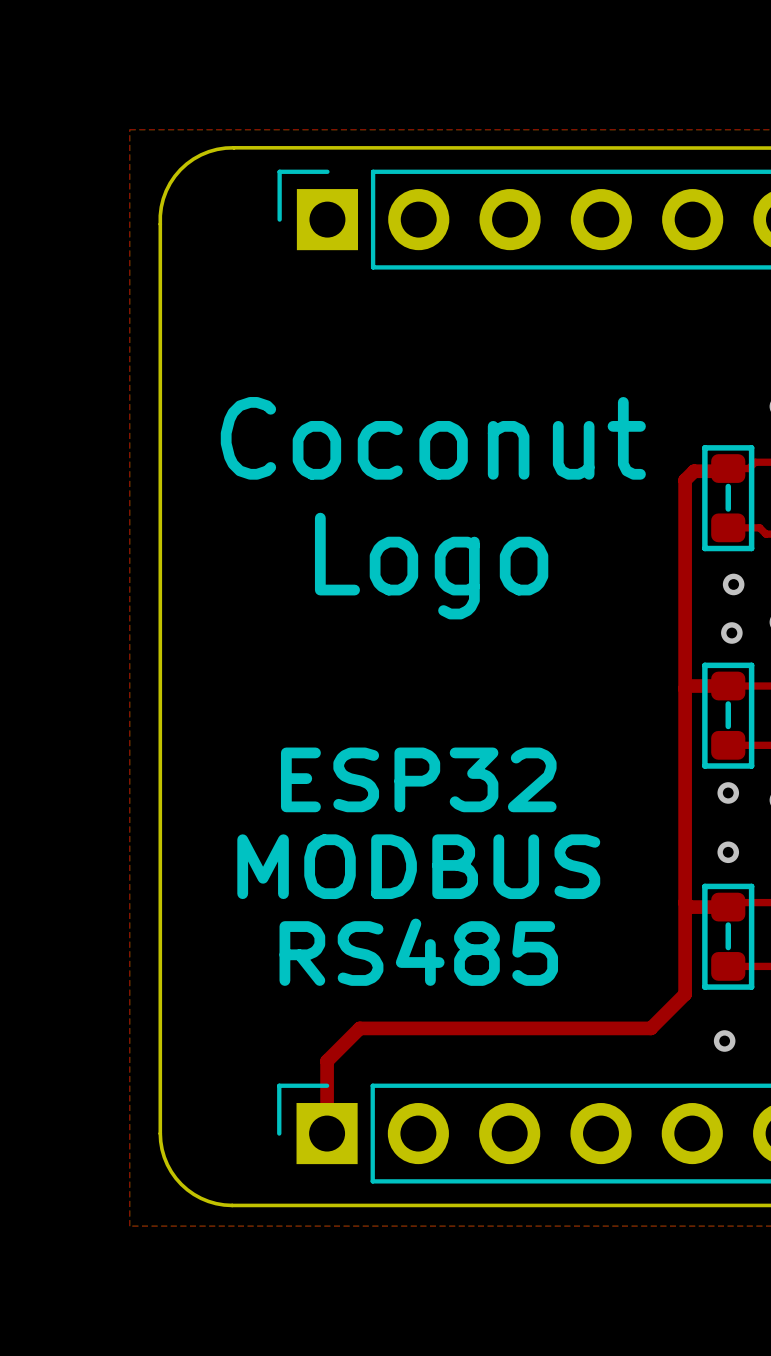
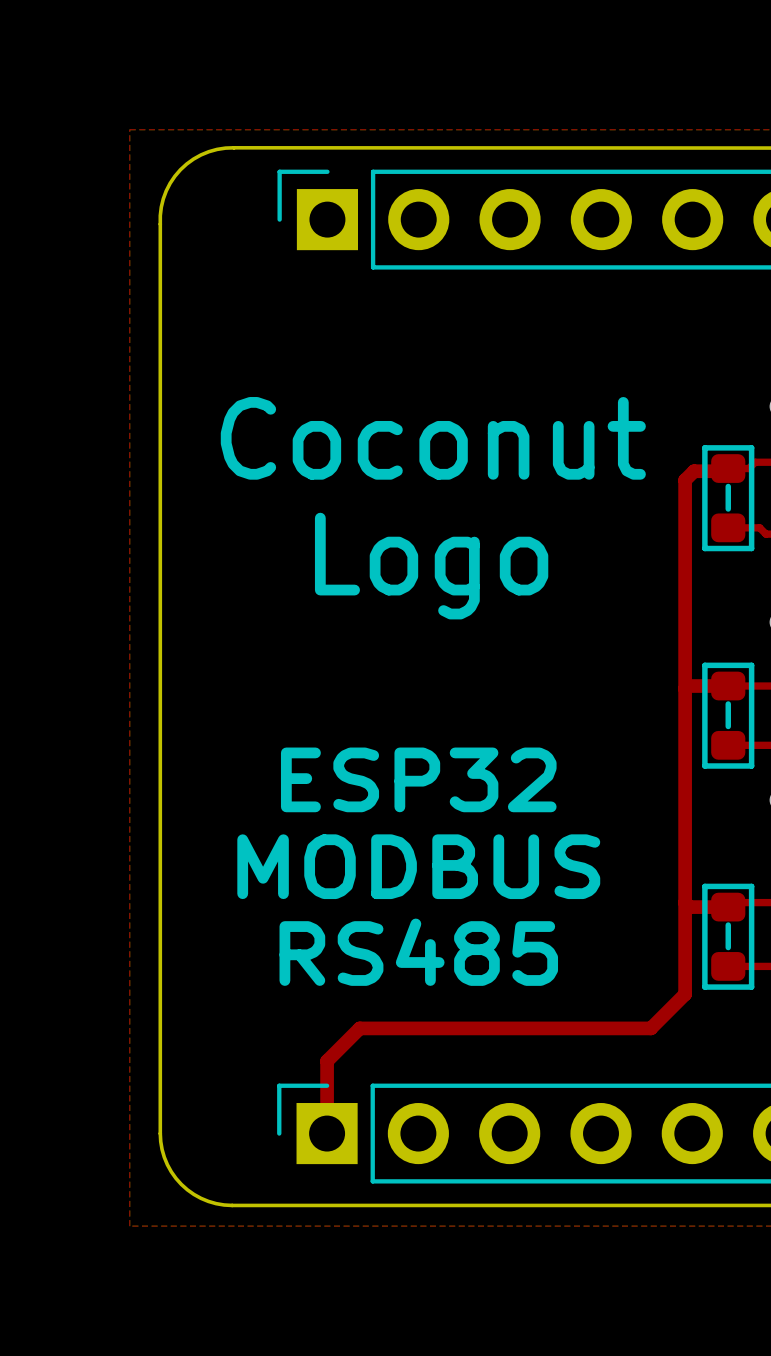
via: (733, 584) -> none
via: (731, 632) -> none
via: (728, 792) -> none
via: (728, 852) -> none
via: (724, 1040) -> none

